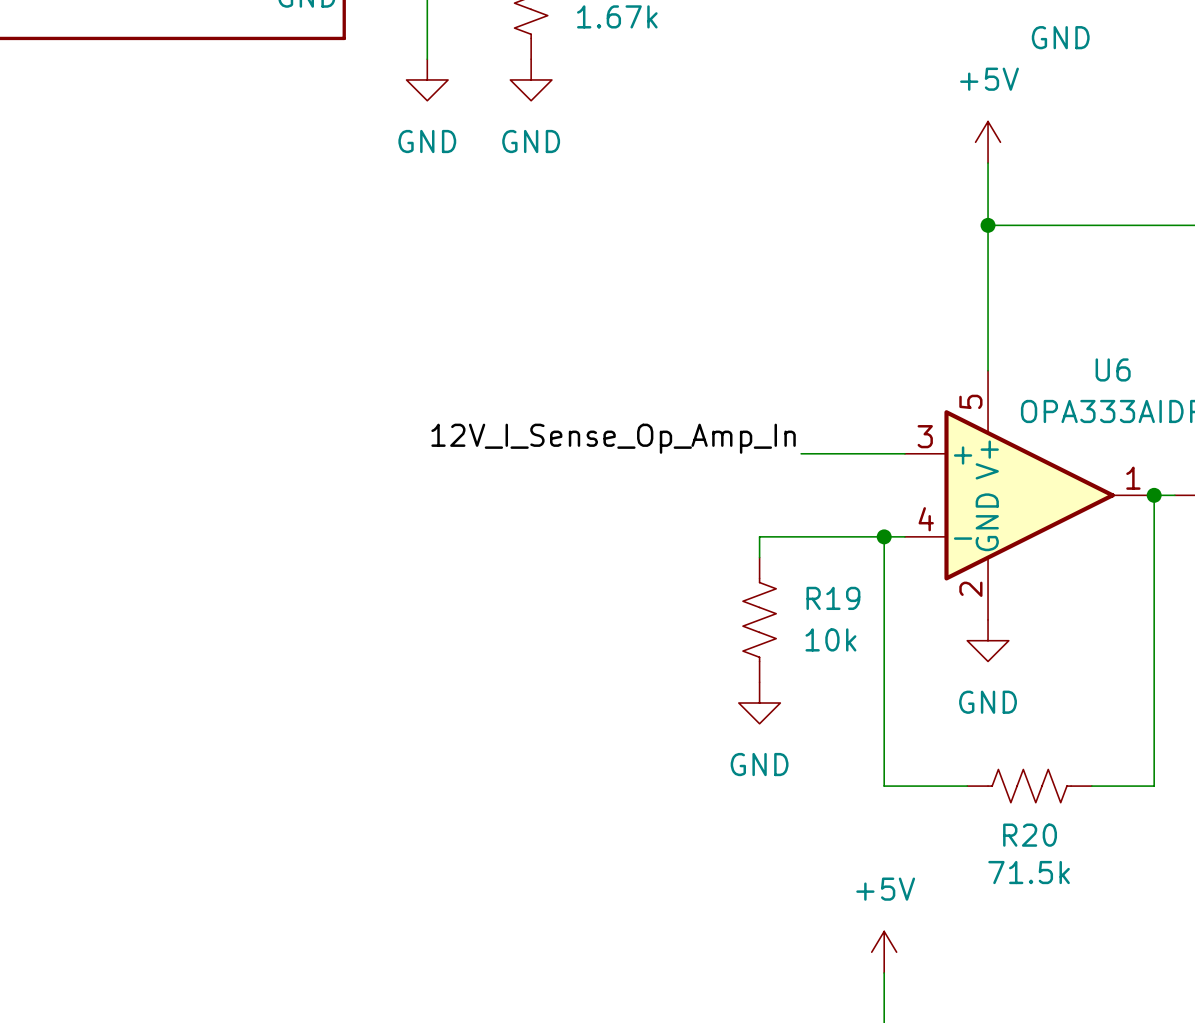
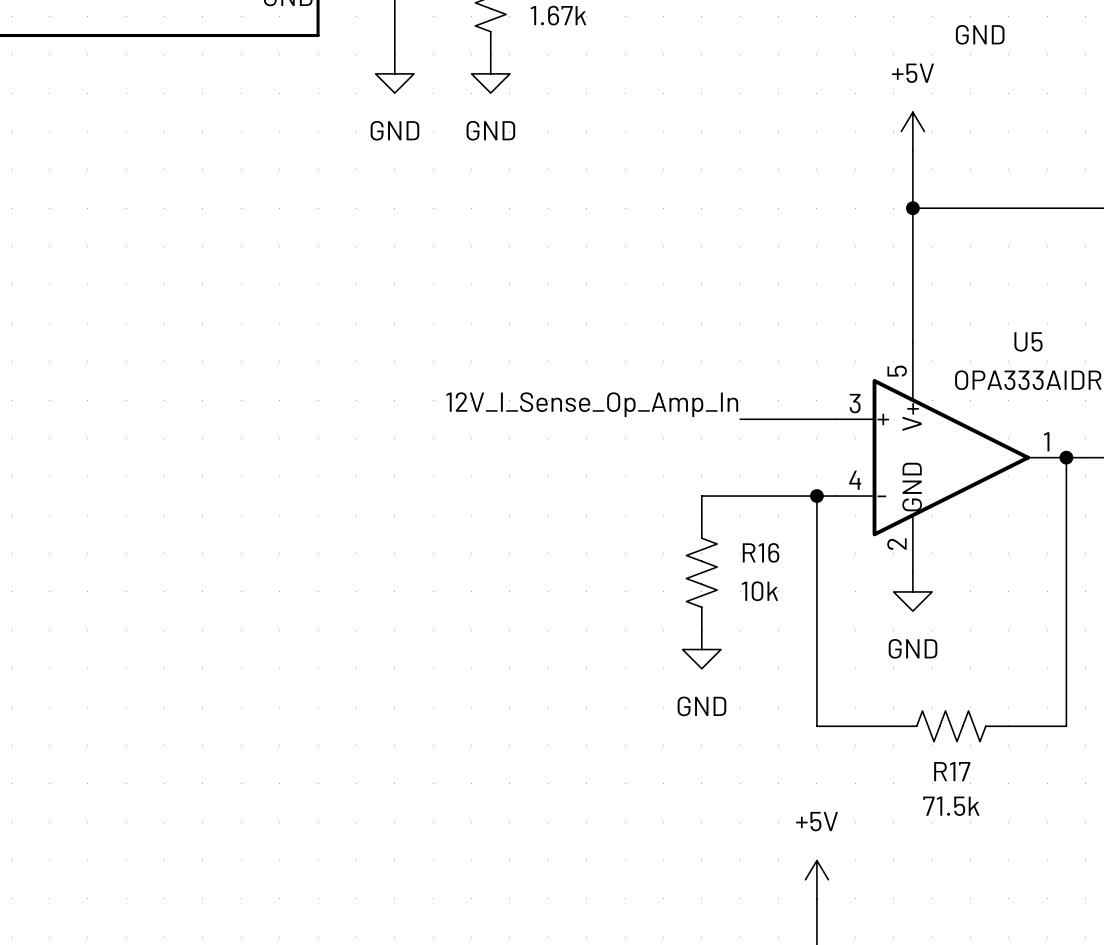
U6 name: U6 (1113, 369) -> U5 (1028, 341)
R19 name: R19 (833, 598) -> R16 (761, 552)
R20 name: R20 (1030, 835) -> R17 (952, 771)

